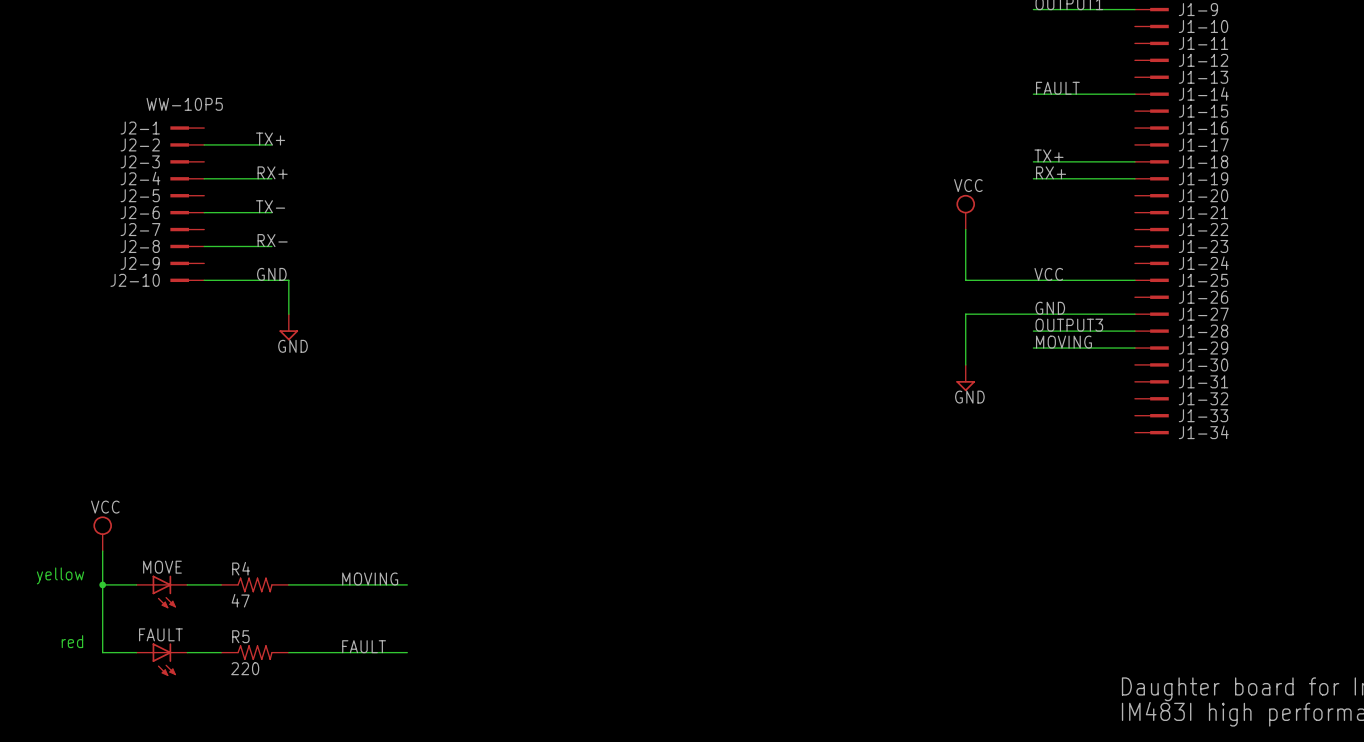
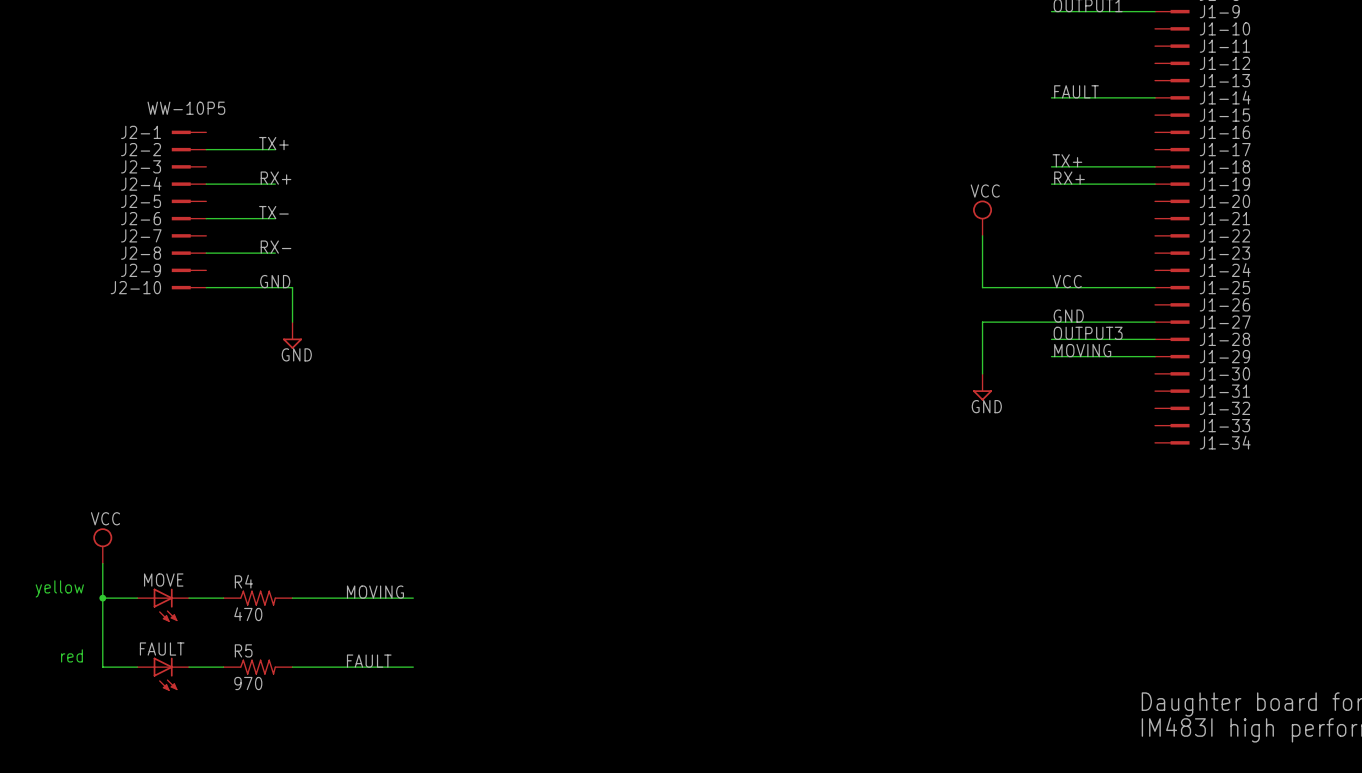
R4 value: 47 (240, 600) -> 470 (248, 614)
R5 value: 220 (245, 668) -> 970 (248, 683)

